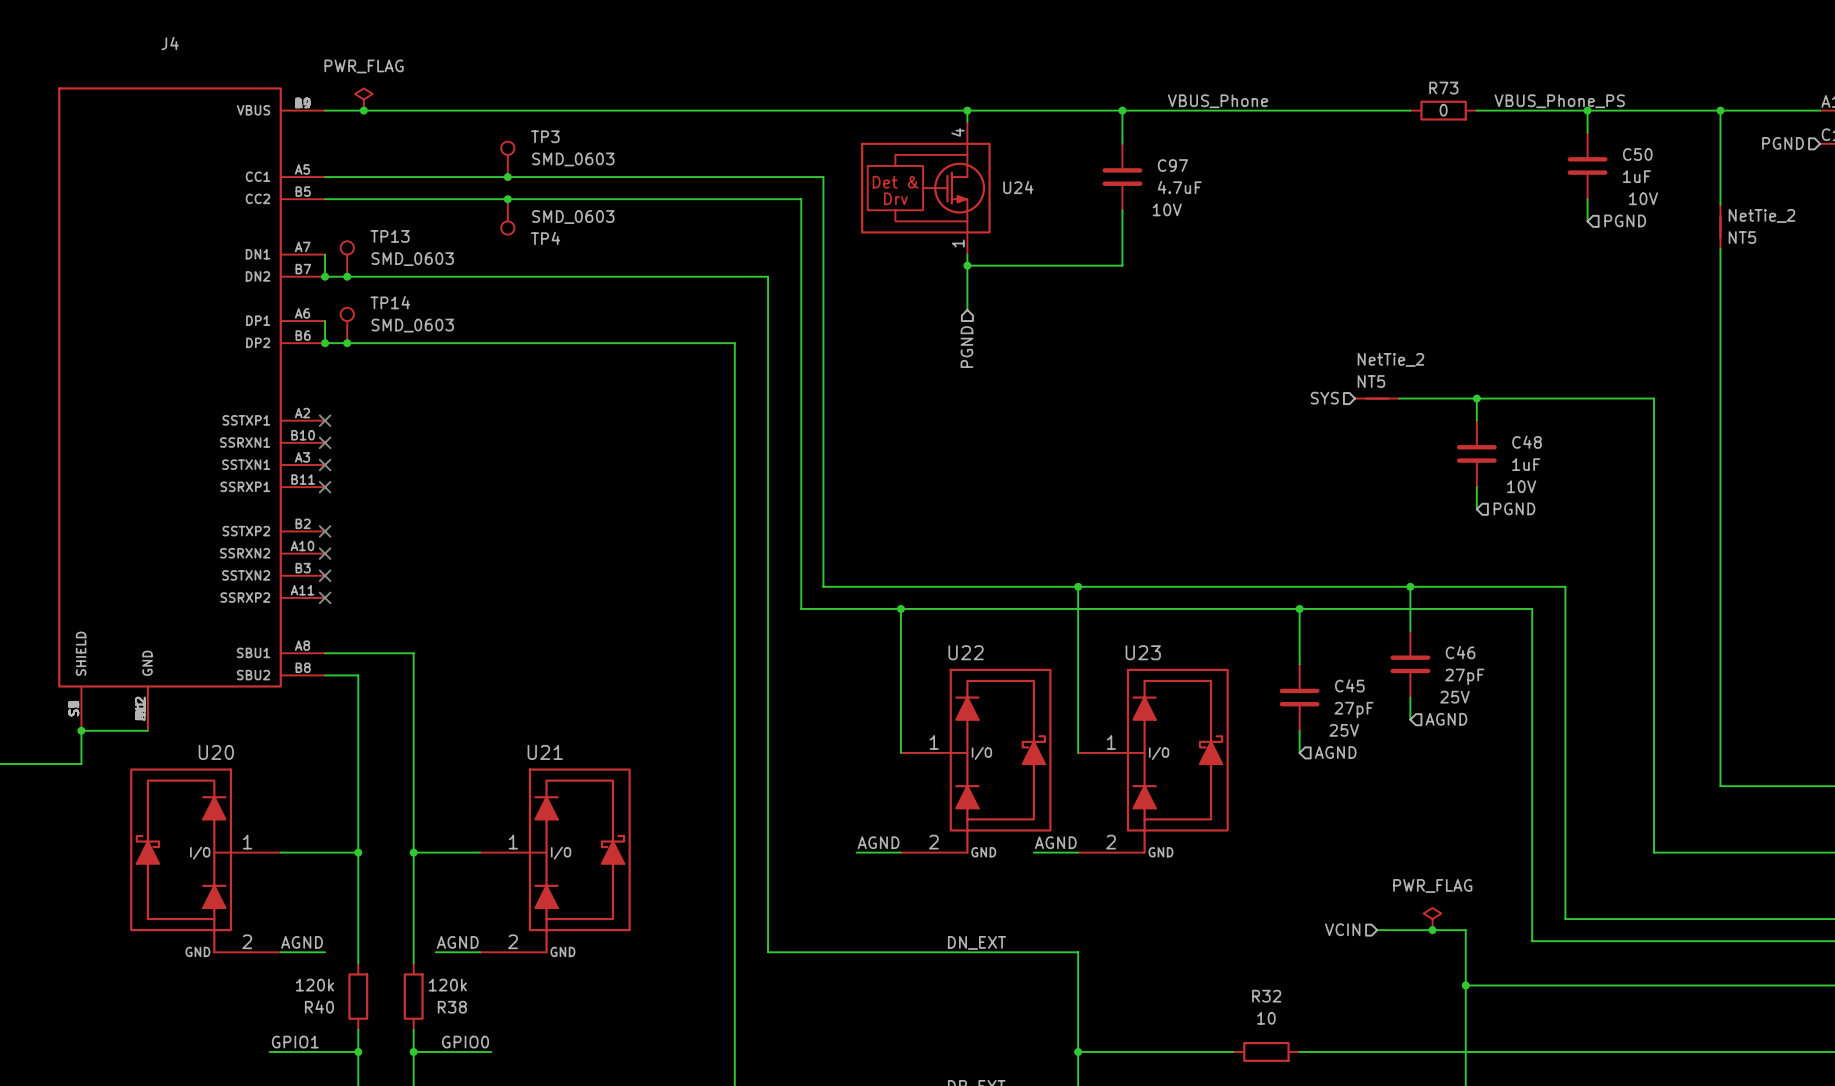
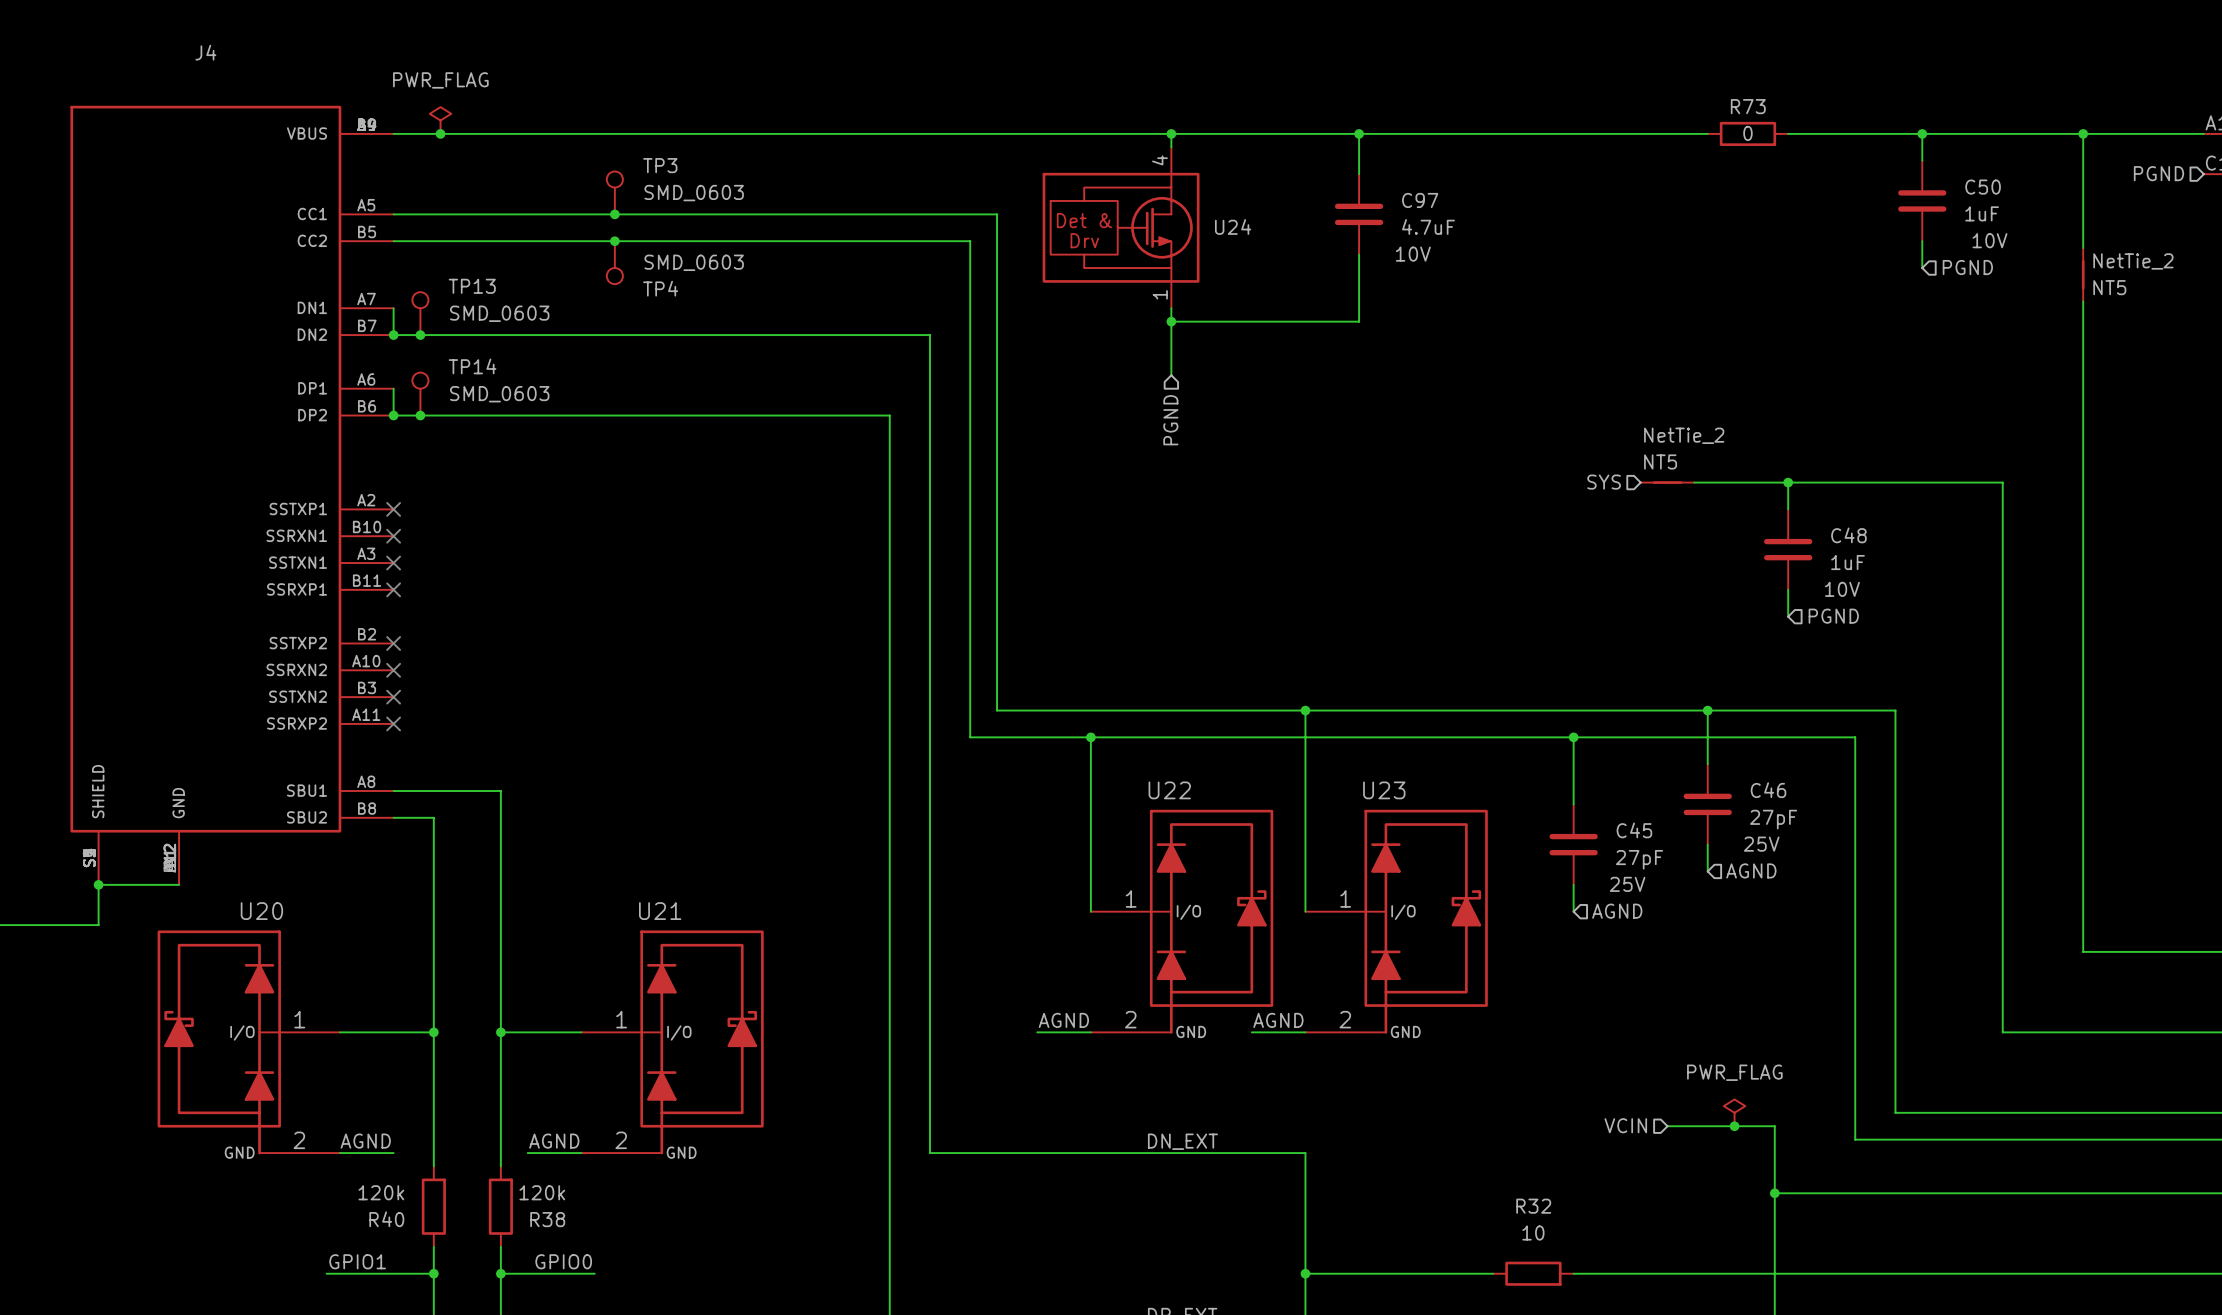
label: VBUS_Phone (1217, 101) -> none
label: VBUS_Phone_PS (1559, 101) -> none

